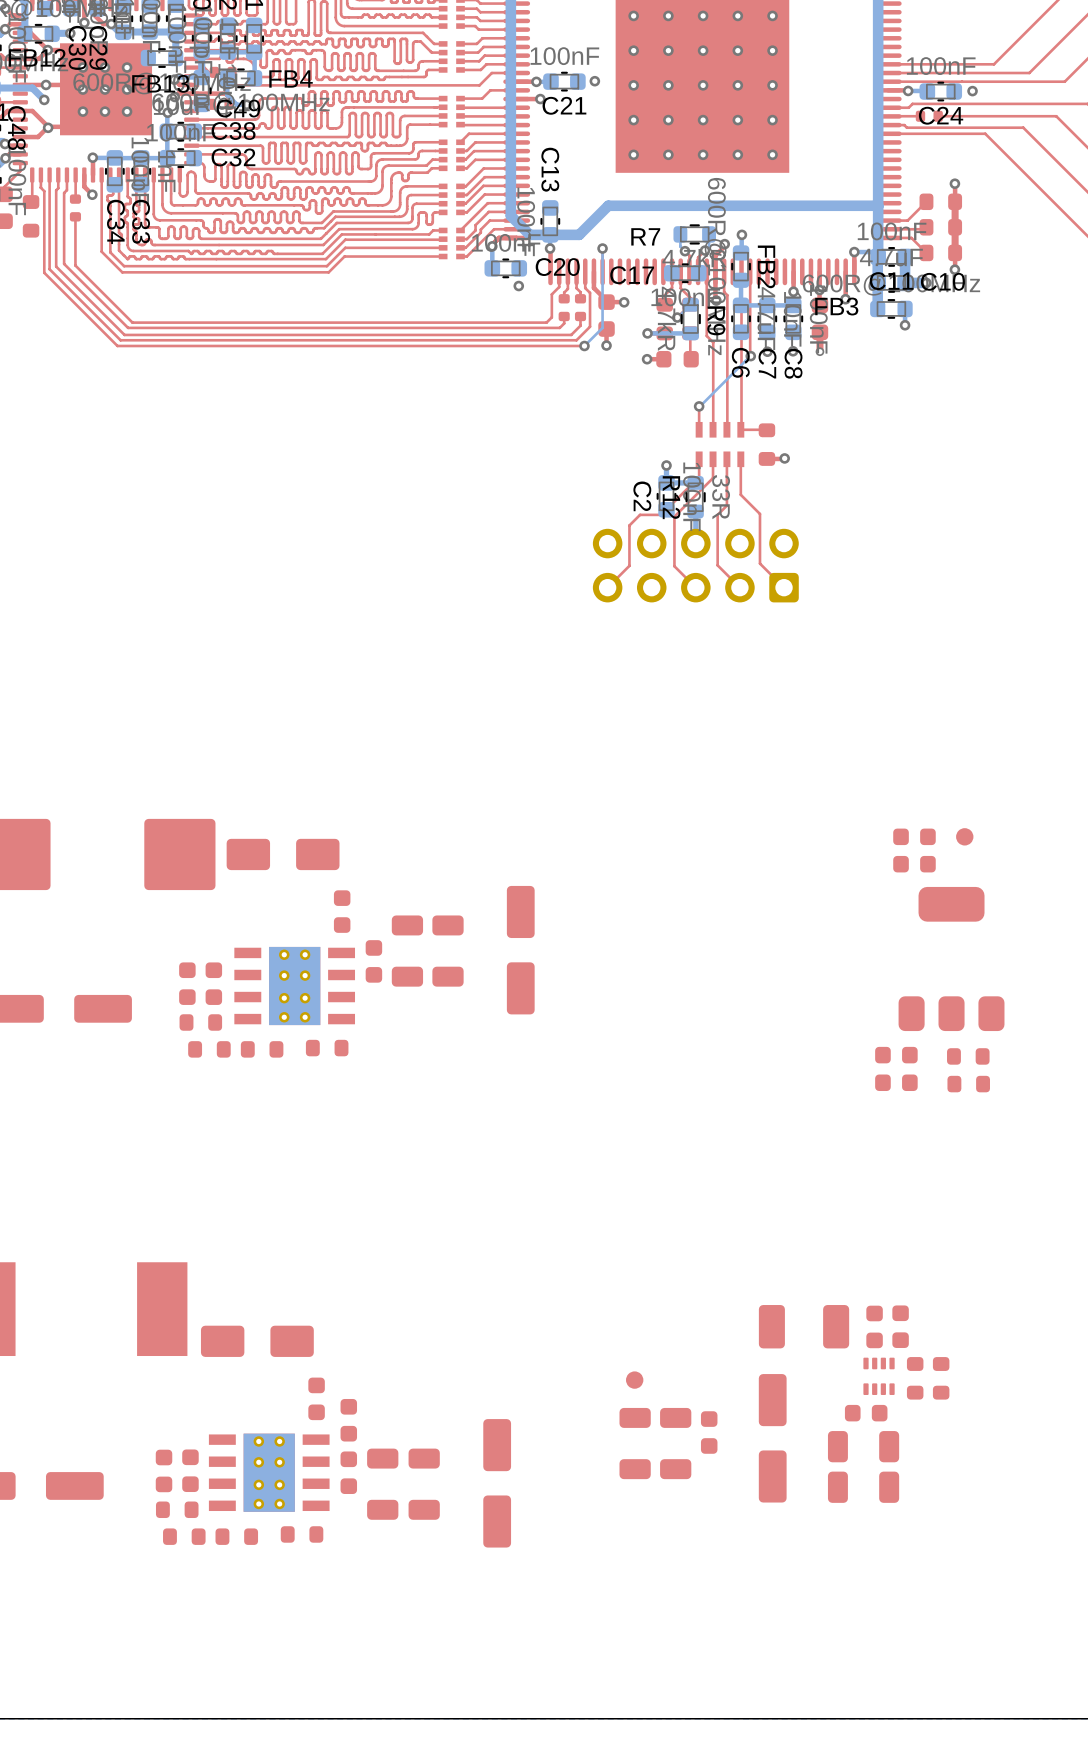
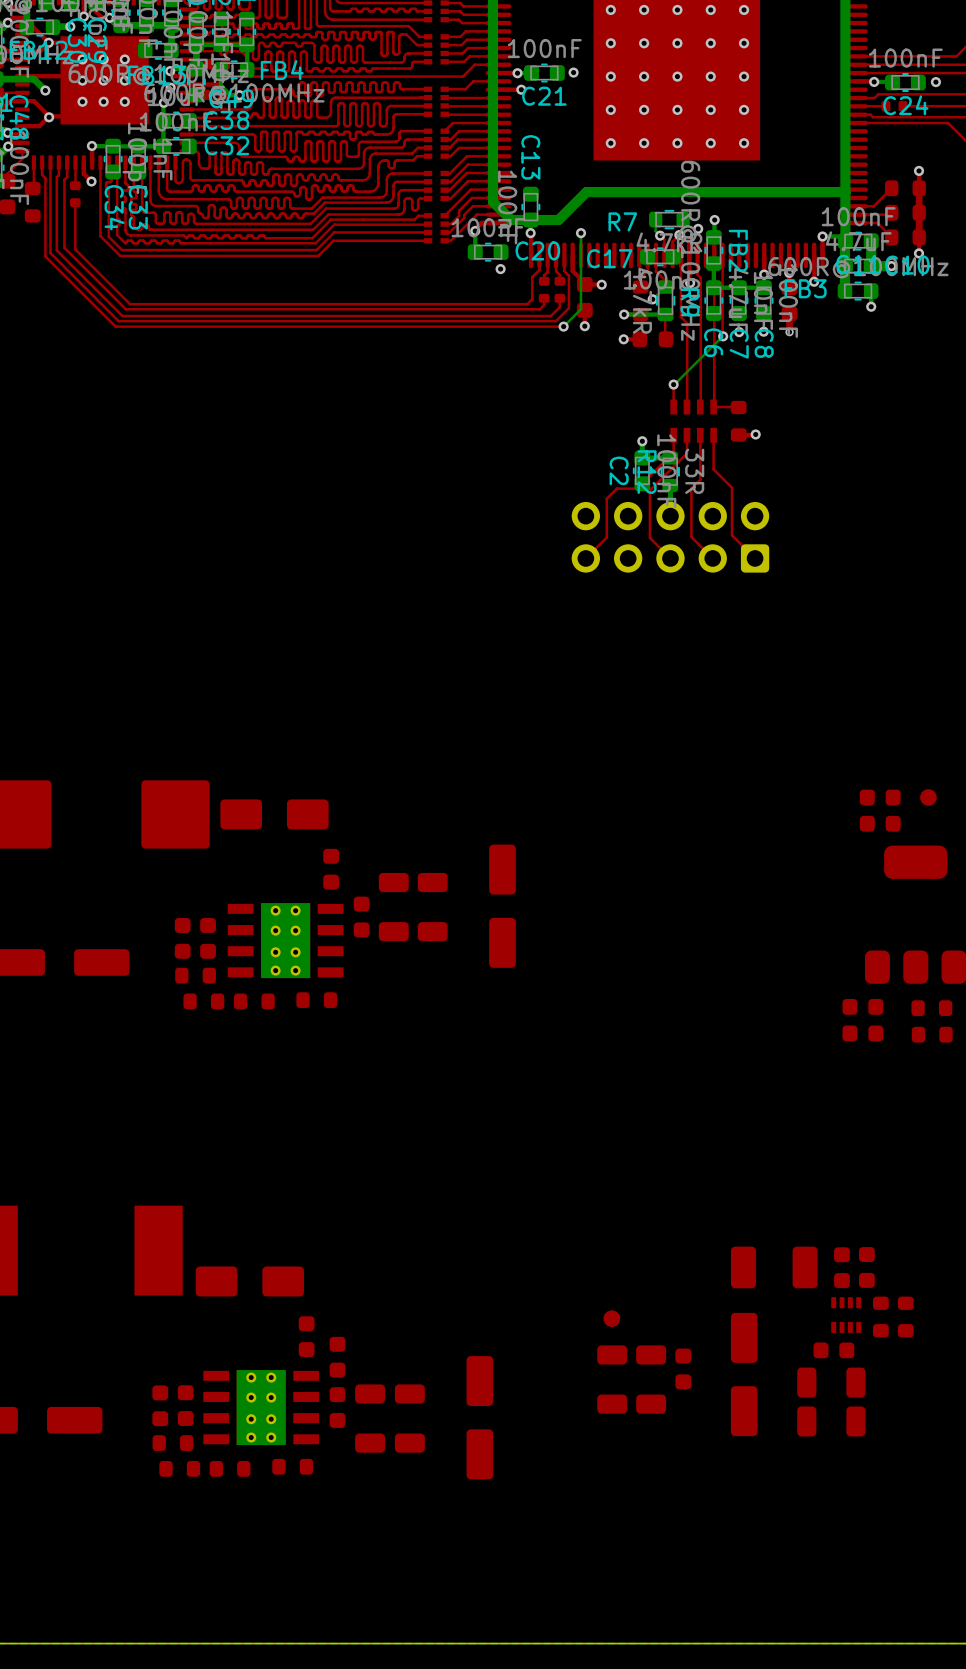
via: (46, 84) -> none

